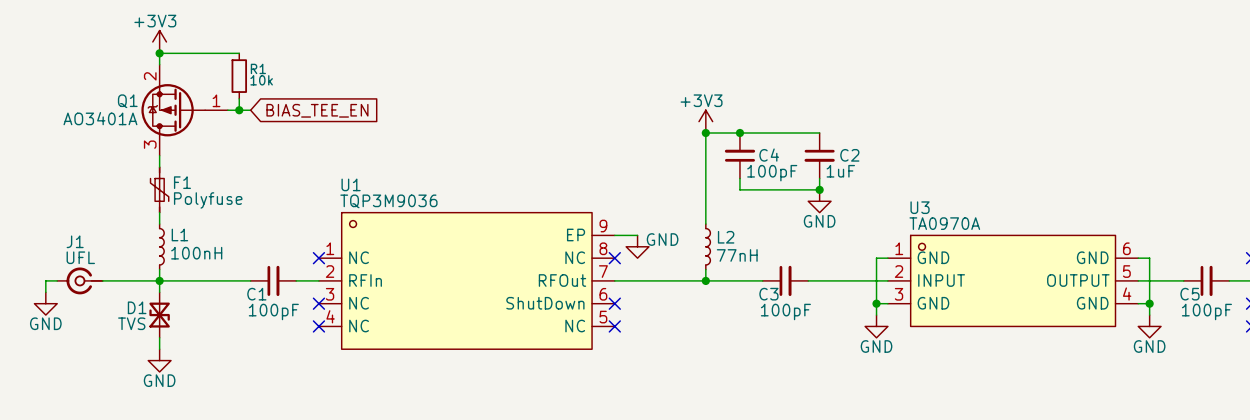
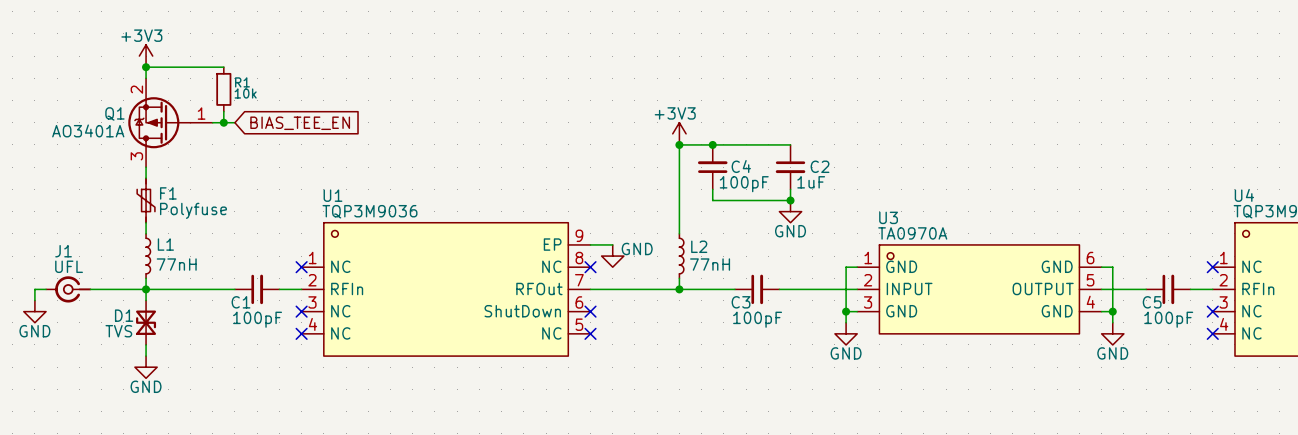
L1 value: 100nH (196, 253) -> 77nH (176, 264)

